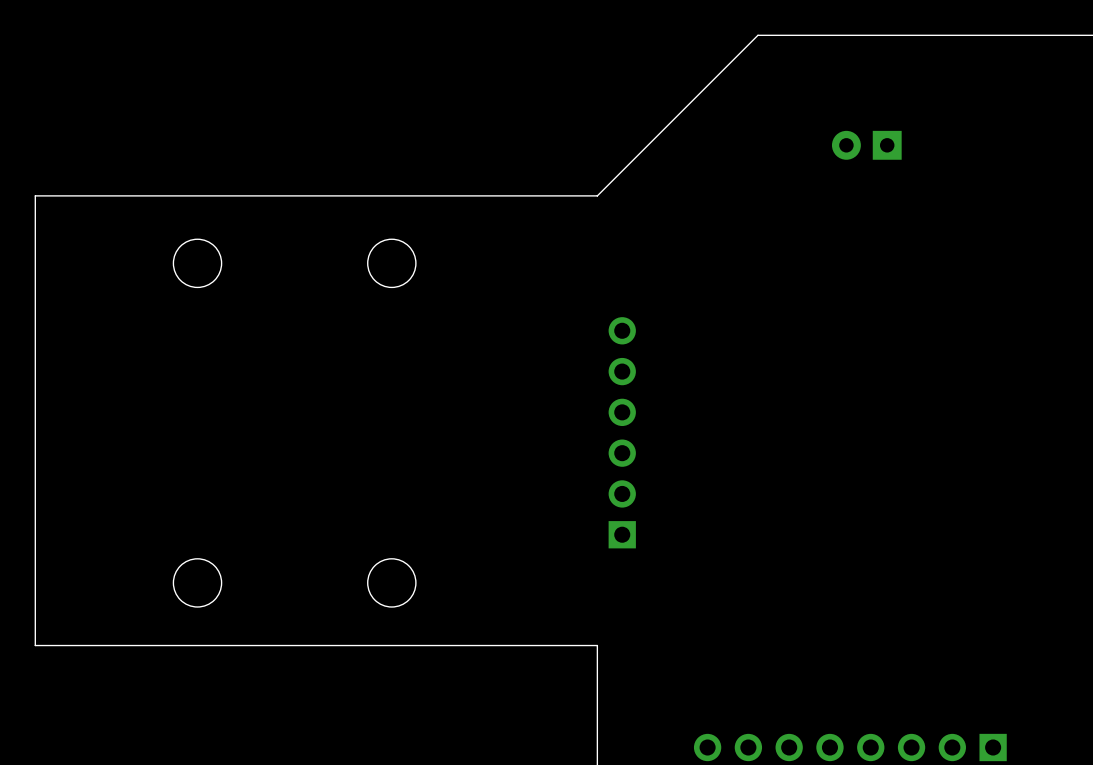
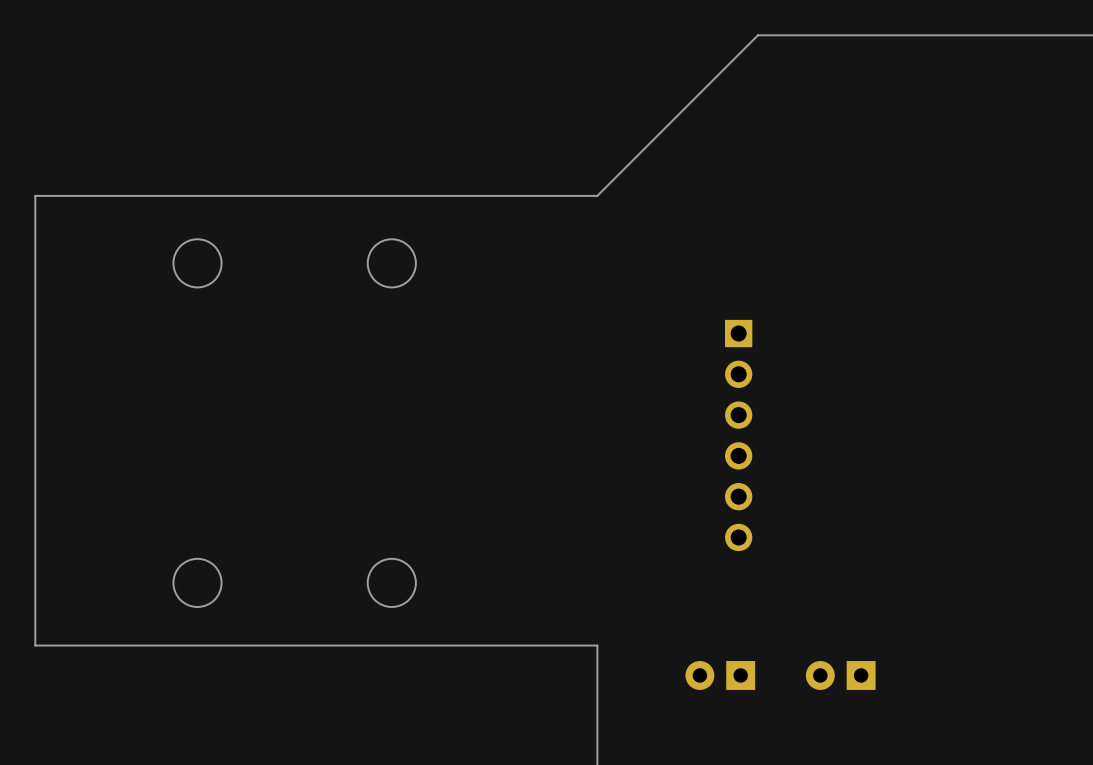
part: (866, 145) -> none
part rotation: 0° (622, 432) -> 180° (738, 435)
part: none -> (720, 675)
part: none -> (840, 675)
part: (850, 747) -> none

